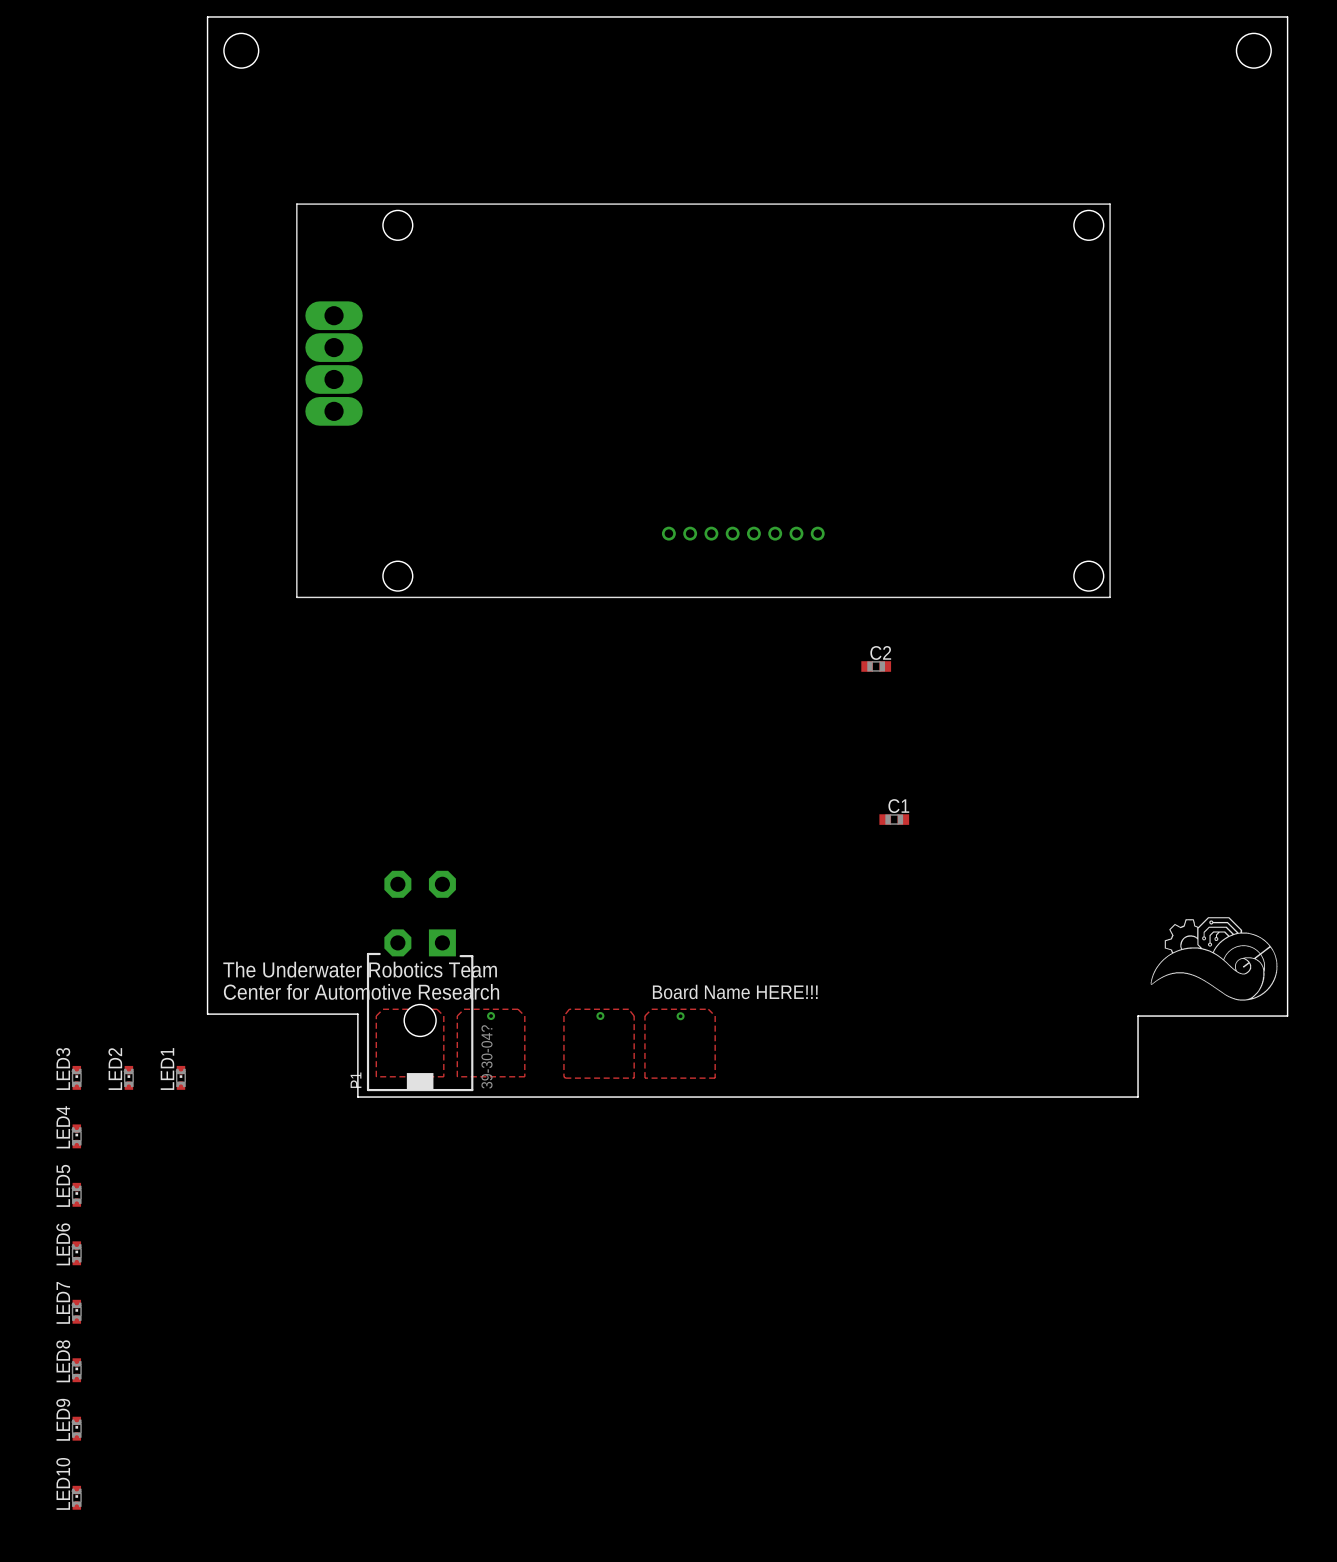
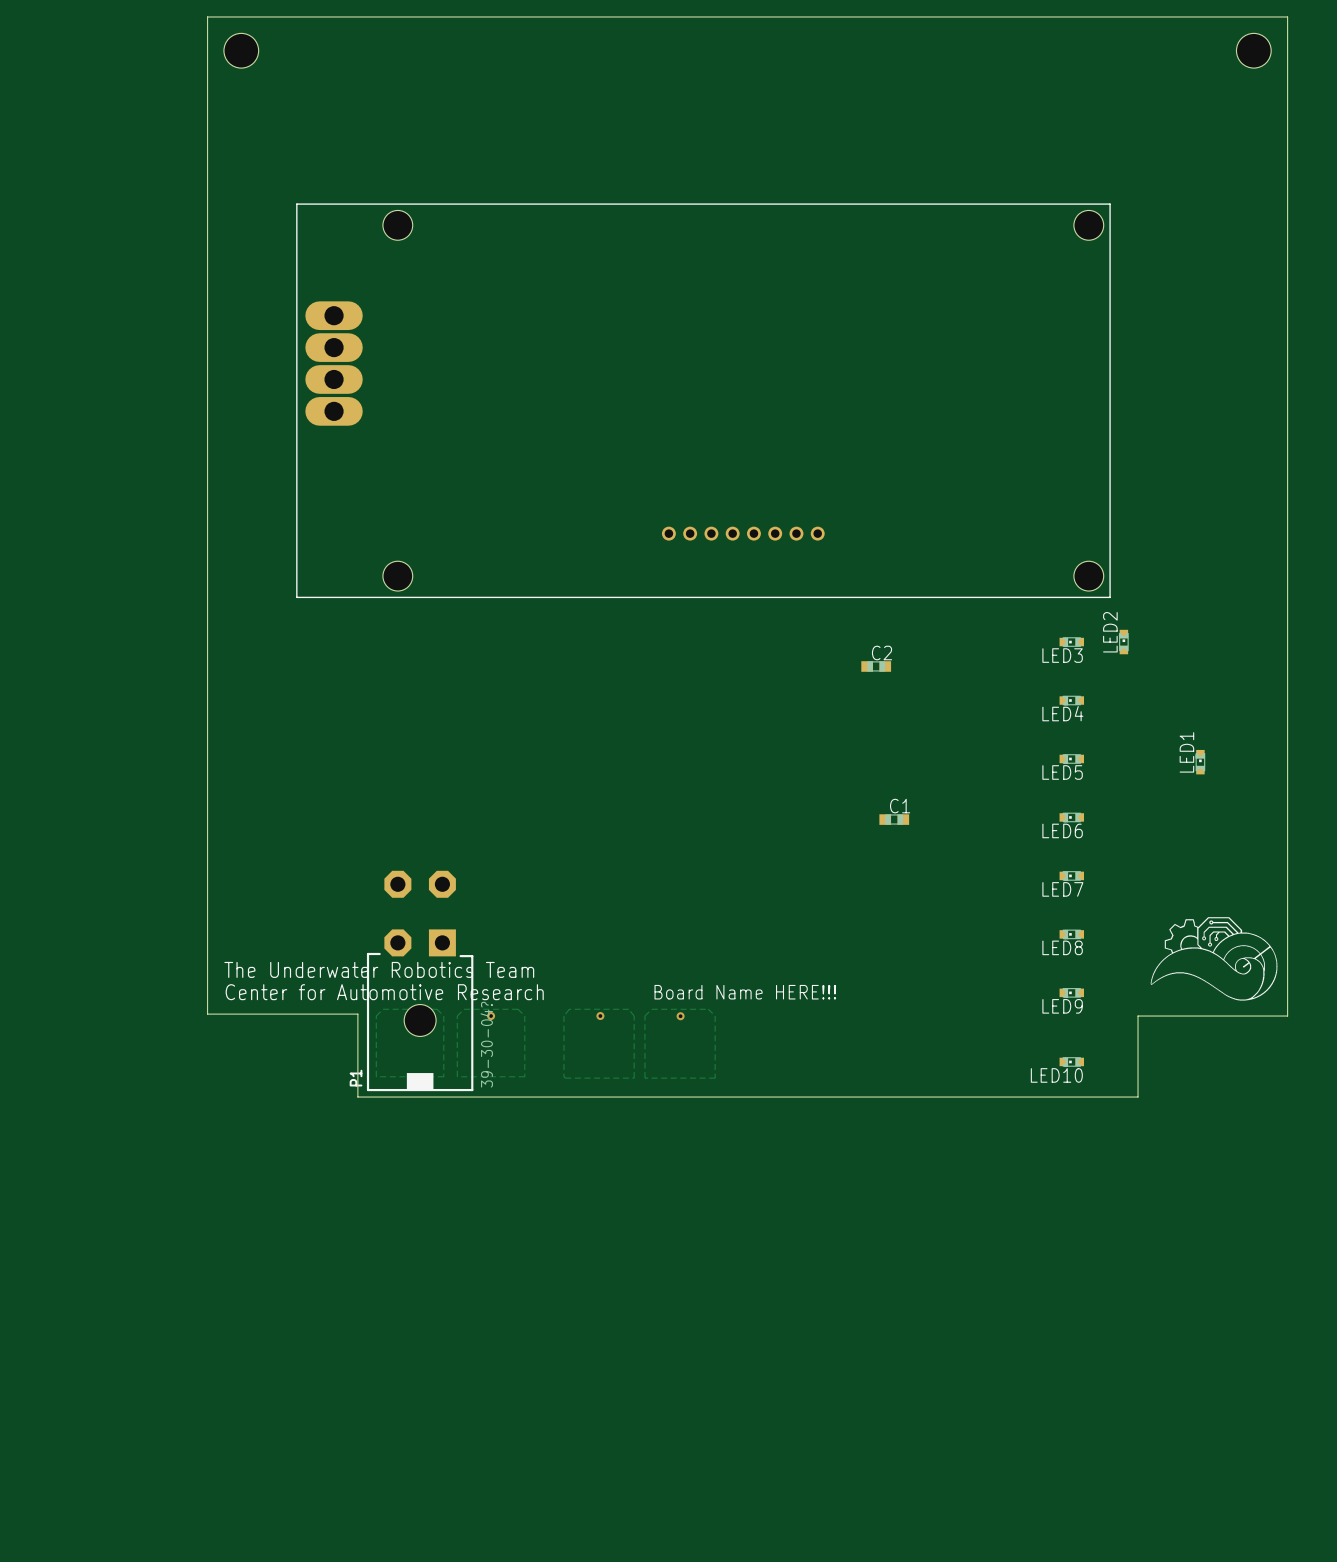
LED3 footprint: [72, 1065, 82, 1090] -> [1059, 637, 1085, 647]
LED2 footprint: [124, 1065, 134, 1090] -> [1119, 629, 1129, 655]
LED1 footprint: [176, 1065, 186, 1090] -> [1195, 749, 1206, 775]
LED3 name position: LED3 (63, 1068) -> LED3 (1062, 655)
LED4 footprint: [72, 1124, 82, 1149] -> [1059, 695, 1085, 706]
LED4 name position: LED4 (63, 1127) -> LED4 (1062, 713)
LED5 footprint: [72, 1182, 82, 1207] -> [1059, 754, 1085, 764]
LED5 name position: LED5 (63, 1185) -> LED5 (1062, 772)
LED6 footprint: [72, 1241, 82, 1266] -> [1059, 812, 1085, 823]
LED6 name position: LED6 (63, 1244) -> LED6 (1062, 830)
LED7 footprint: [72, 1299, 82, 1324] -> [1059, 871, 1085, 881]
LED7 name position: LED7 (63, 1302) -> LED7 (1062, 889)
LED8 footprint: [72, 1358, 82, 1383] -> [1059, 929, 1085, 940]
LED8 name position: LED8 (63, 1361) -> LED8 (1062, 947)
LED9 footprint: [72, 1416, 82, 1441] -> [1059, 988, 1085, 998]
LED9 name position: LED9 (63, 1419) -> LED9 (1062, 1006)
LED10 name position: LED10 (63, 1483) -> LED10 (1056, 1075)
LED10 footprint: [72, 1485, 82, 1510] -> [1059, 1057, 1085, 1067]

